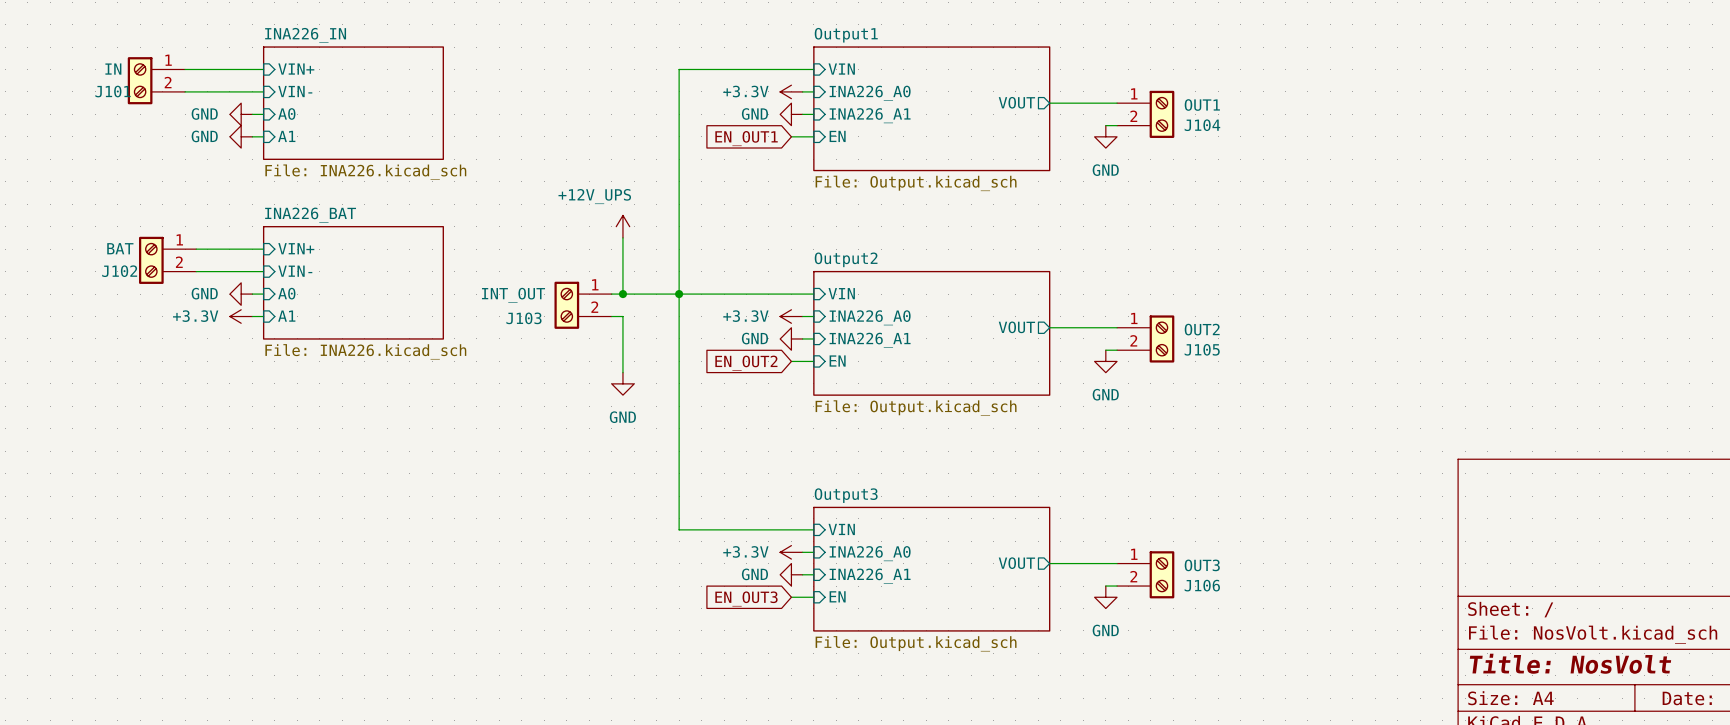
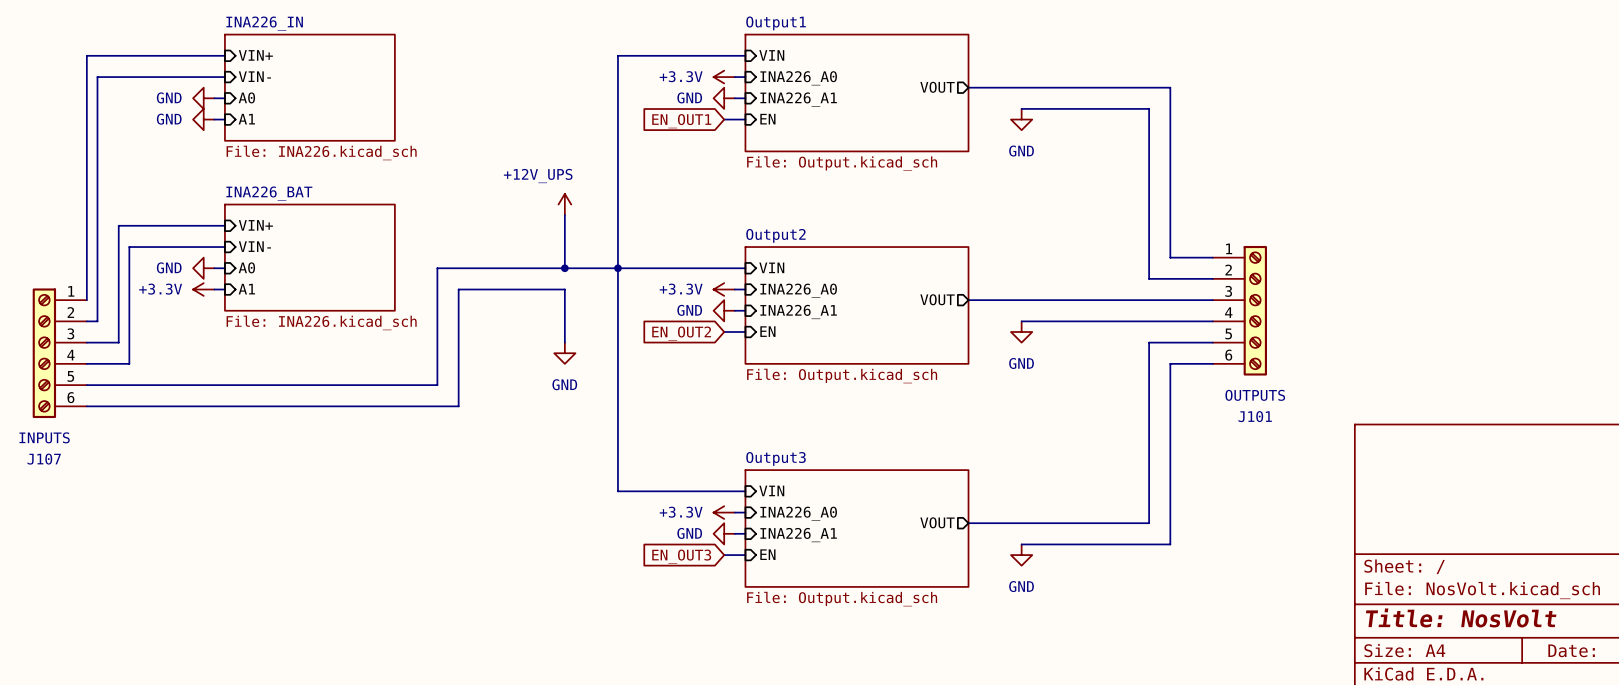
J101 symbol: [127, 57, 186, 105] -> [1212, 245, 1268, 376]
J101 value: IN (113, 69) -> OUTPUTS (1255, 395)
wire: none -> (150, 55) (86, 55) (86, 300)
J101 name position: J101 (113, 91) -> J101 (1255, 416)
wire: none -> (150, 77) (97, 77) (97, 321) (86, 321)
wire: none -> (1032, 87) (1170, 87) (1170, 257) (1212, 257)
J104: OUT1 (1145, 114) -> none
wire: none -> (1032, 108) (1149, 108) (1149, 278) (1212, 278)
wire: none -> (161, 225) (118, 225) (118, 342) (86, 342)
J102: BAT (167, 260) -> none
wire: none -> (161, 247) (129, 247) (129, 363) (86, 363)
wire: none -> (554, 268) (437, 268) (437, 385) (86, 385)
J103: INT_OUT (583, 305) -> none
wire: none -> (554, 289) (458, 289) (458, 406) (86, 406)
wire: none -> (1032, 300) (1212, 300)
J105: OUT2 (1145, 338) -> none
wire: none -> (1032, 321) (1212, 321)
wire: none -> (1212, 342) (1149, 342) (1149, 523) (1032, 523)
J107: none -> INPUTS (59, 353)
wire: none -> (1212, 363) (1170, 363) (1170, 544) (1032, 544)
J106: OUT3 (1145, 574) -> none

